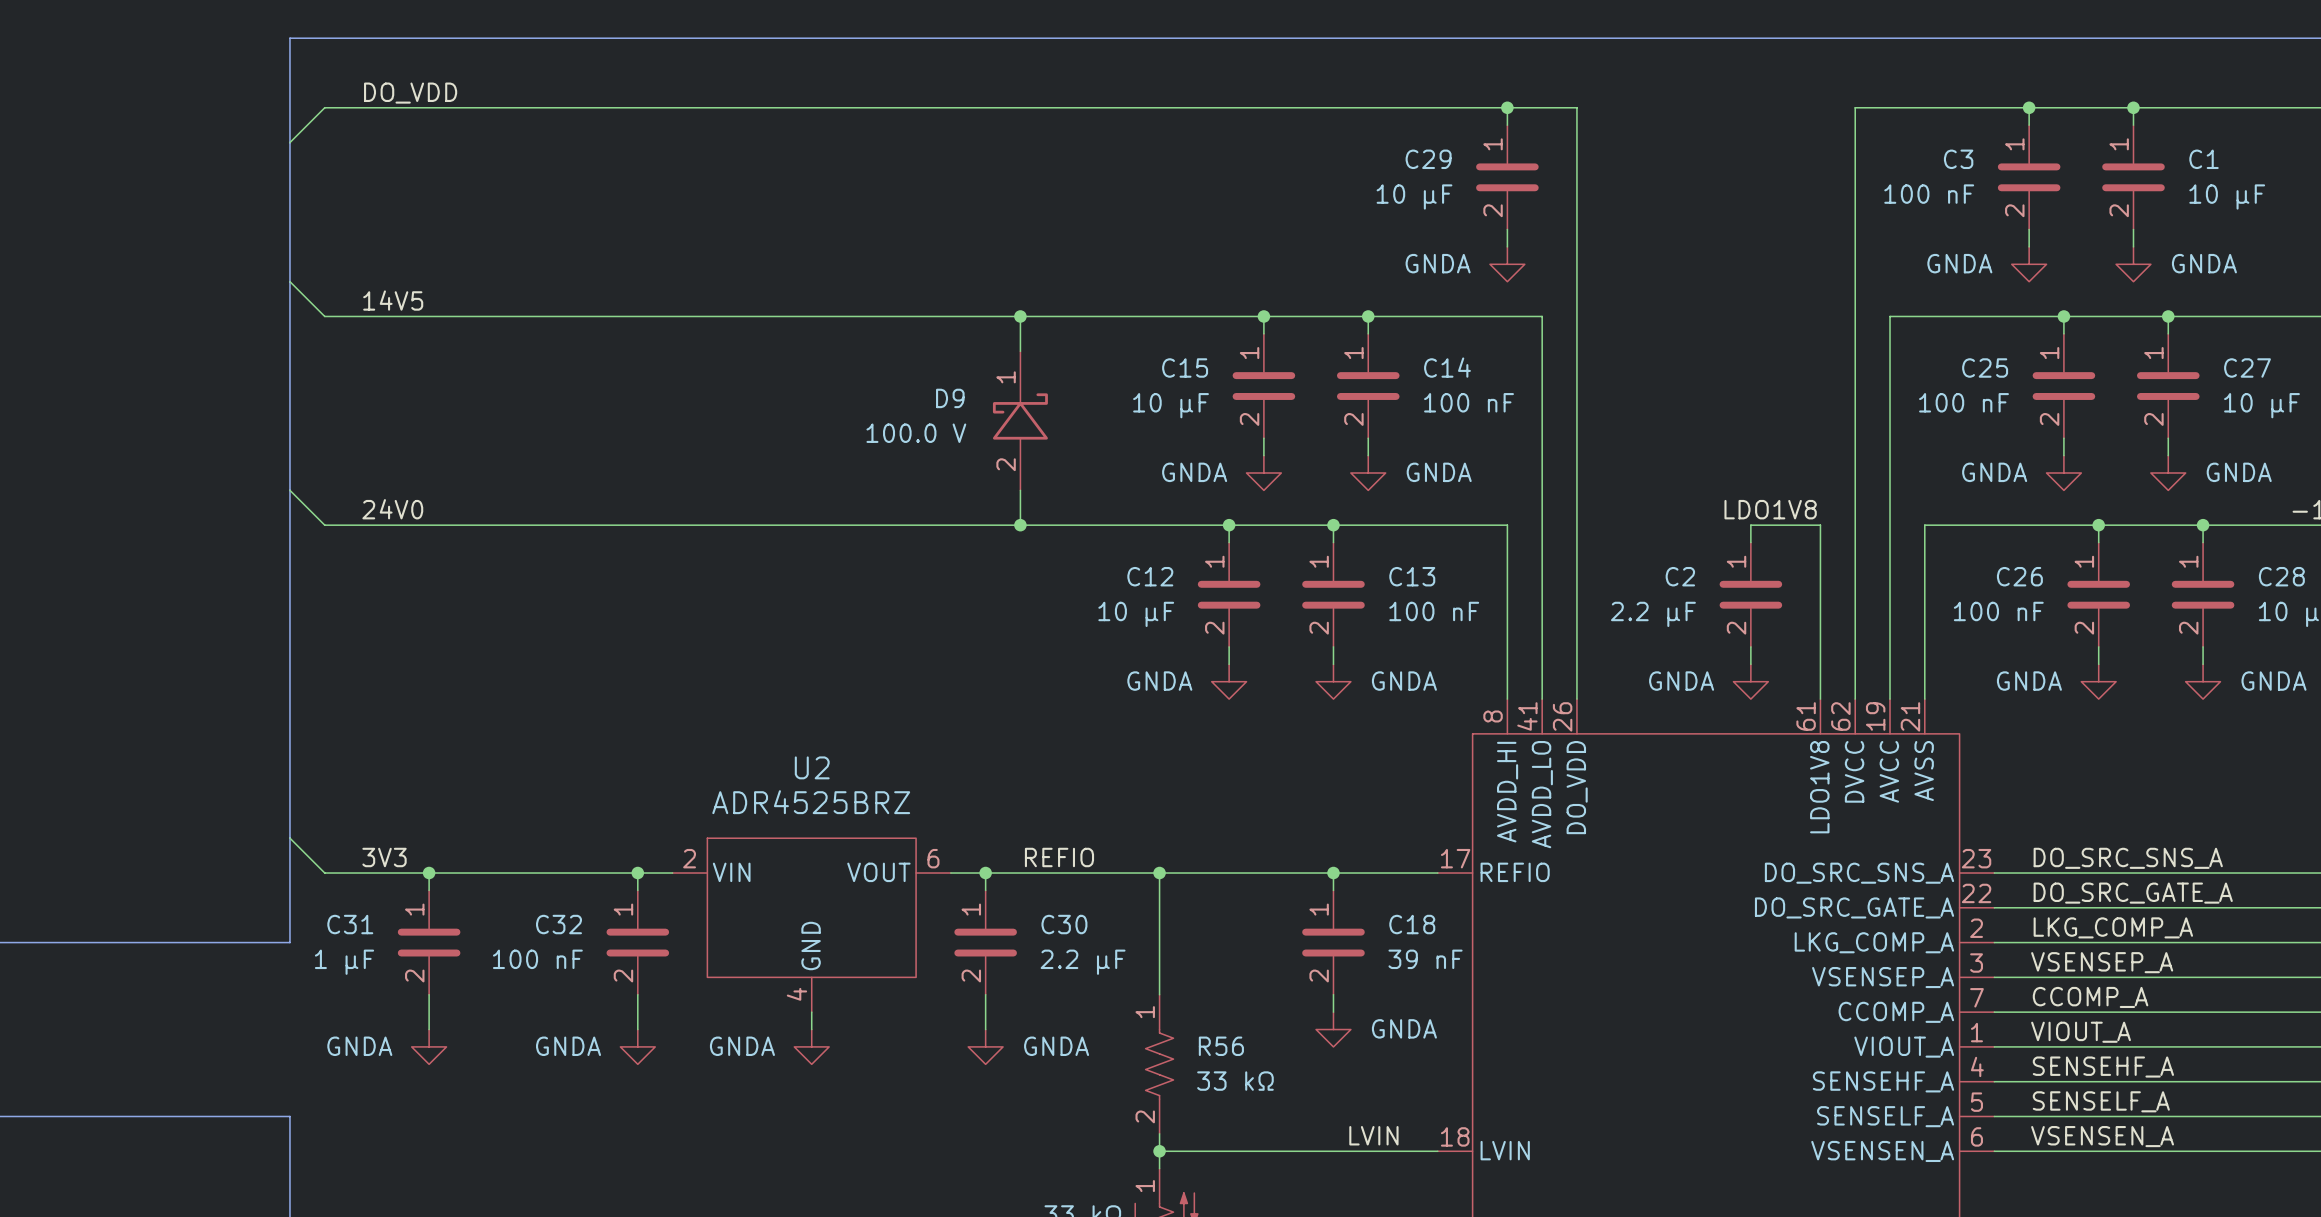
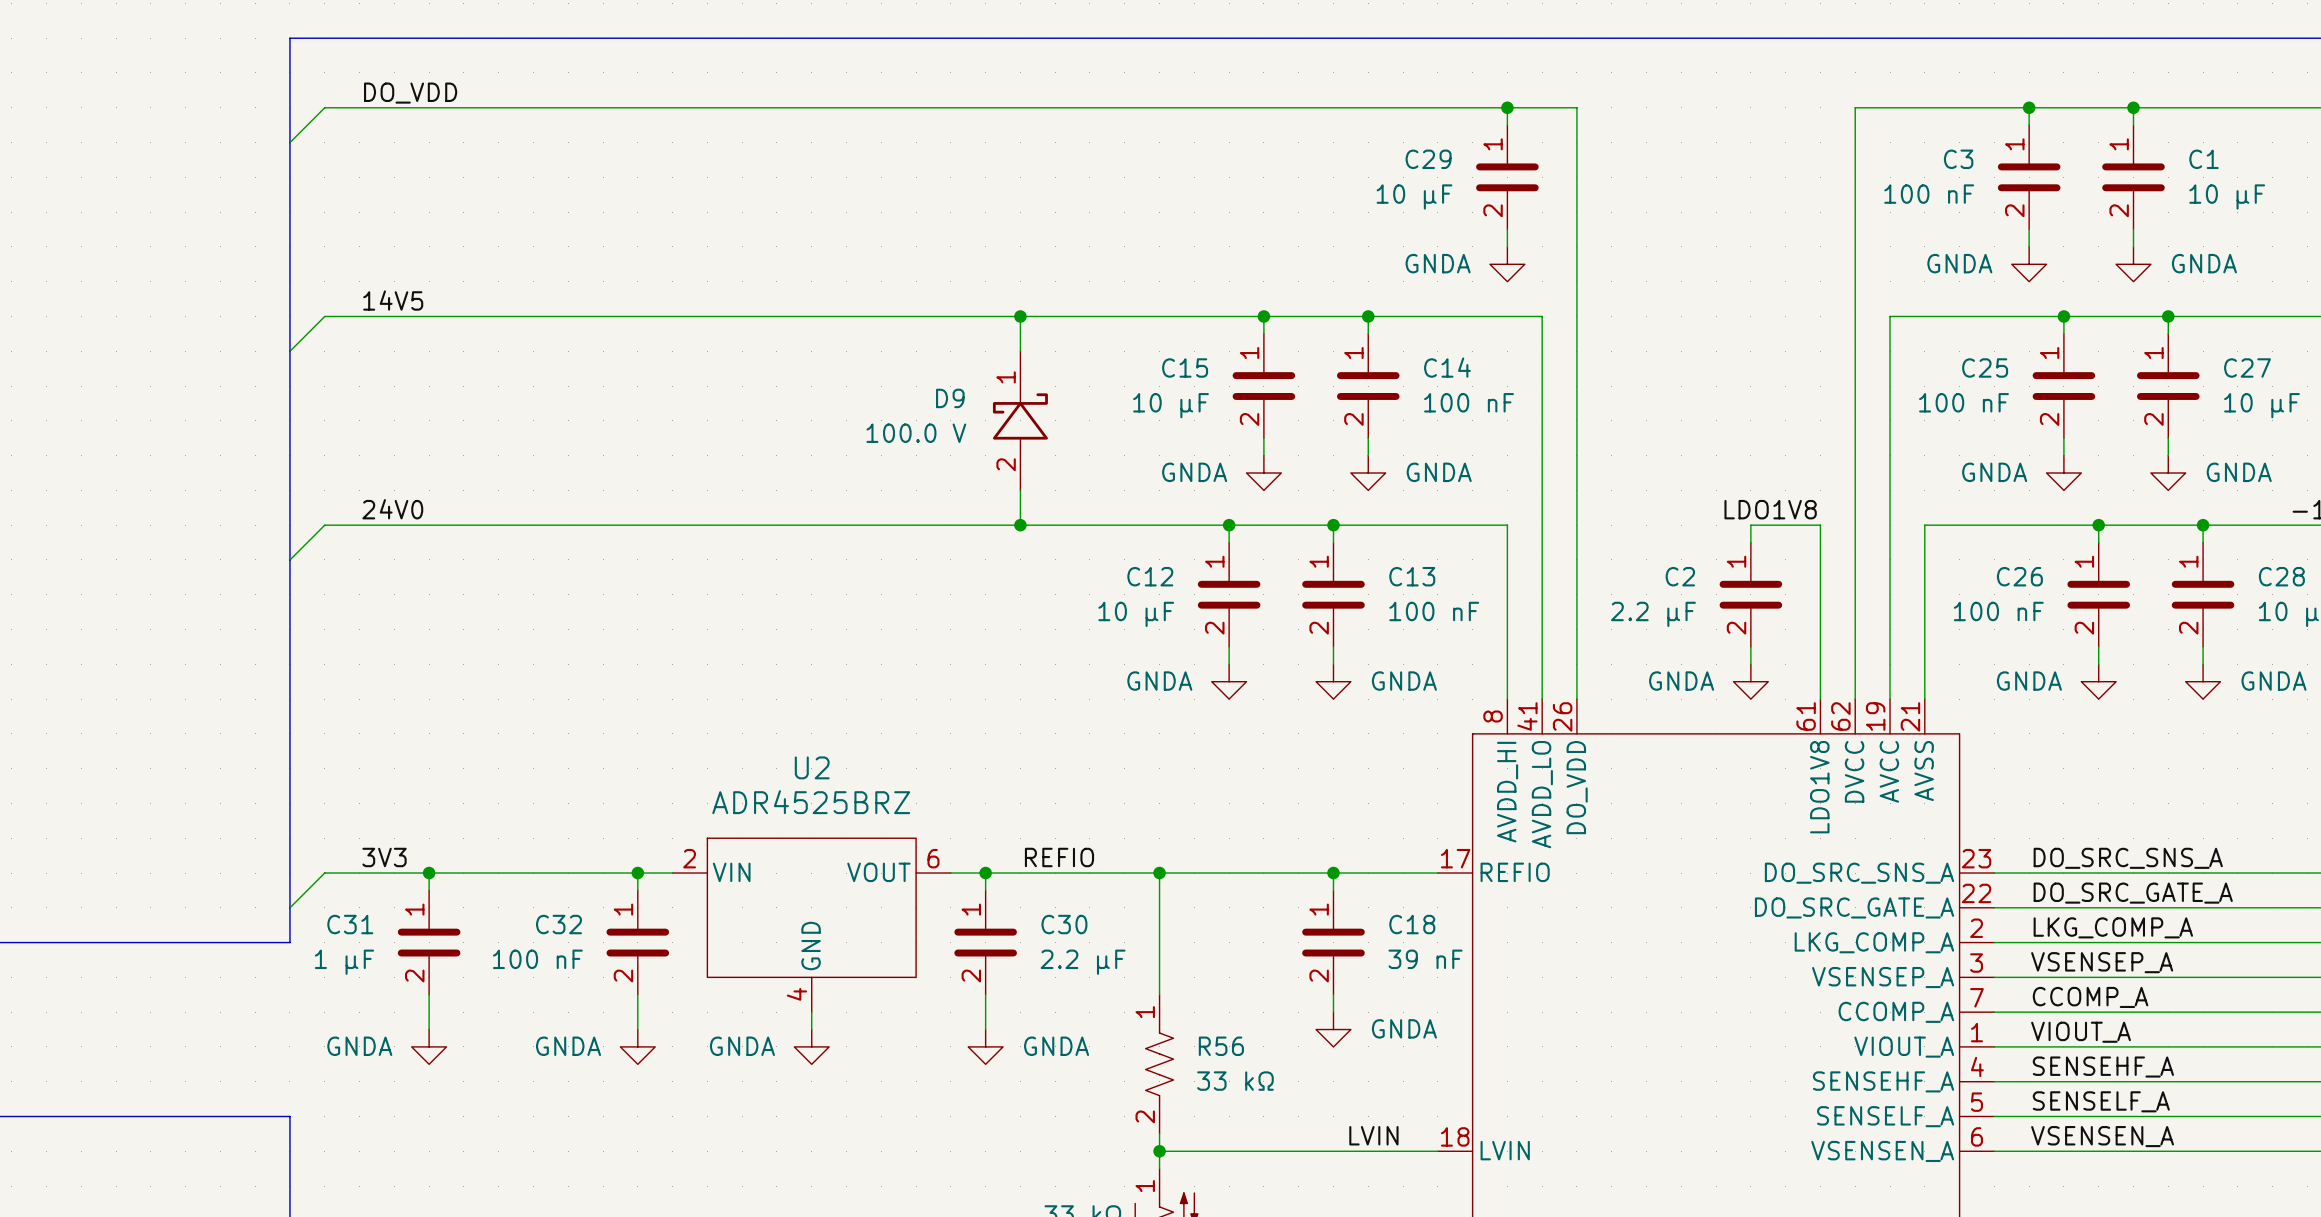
wire: (289, 281) (324, 316) -> (289, 351) (324, 316)
wire: (289, 490) (324, 525) -> (289, 559) (324, 525)
wire: (289, 838) (324, 873) -> (289, 907) (324, 873)

